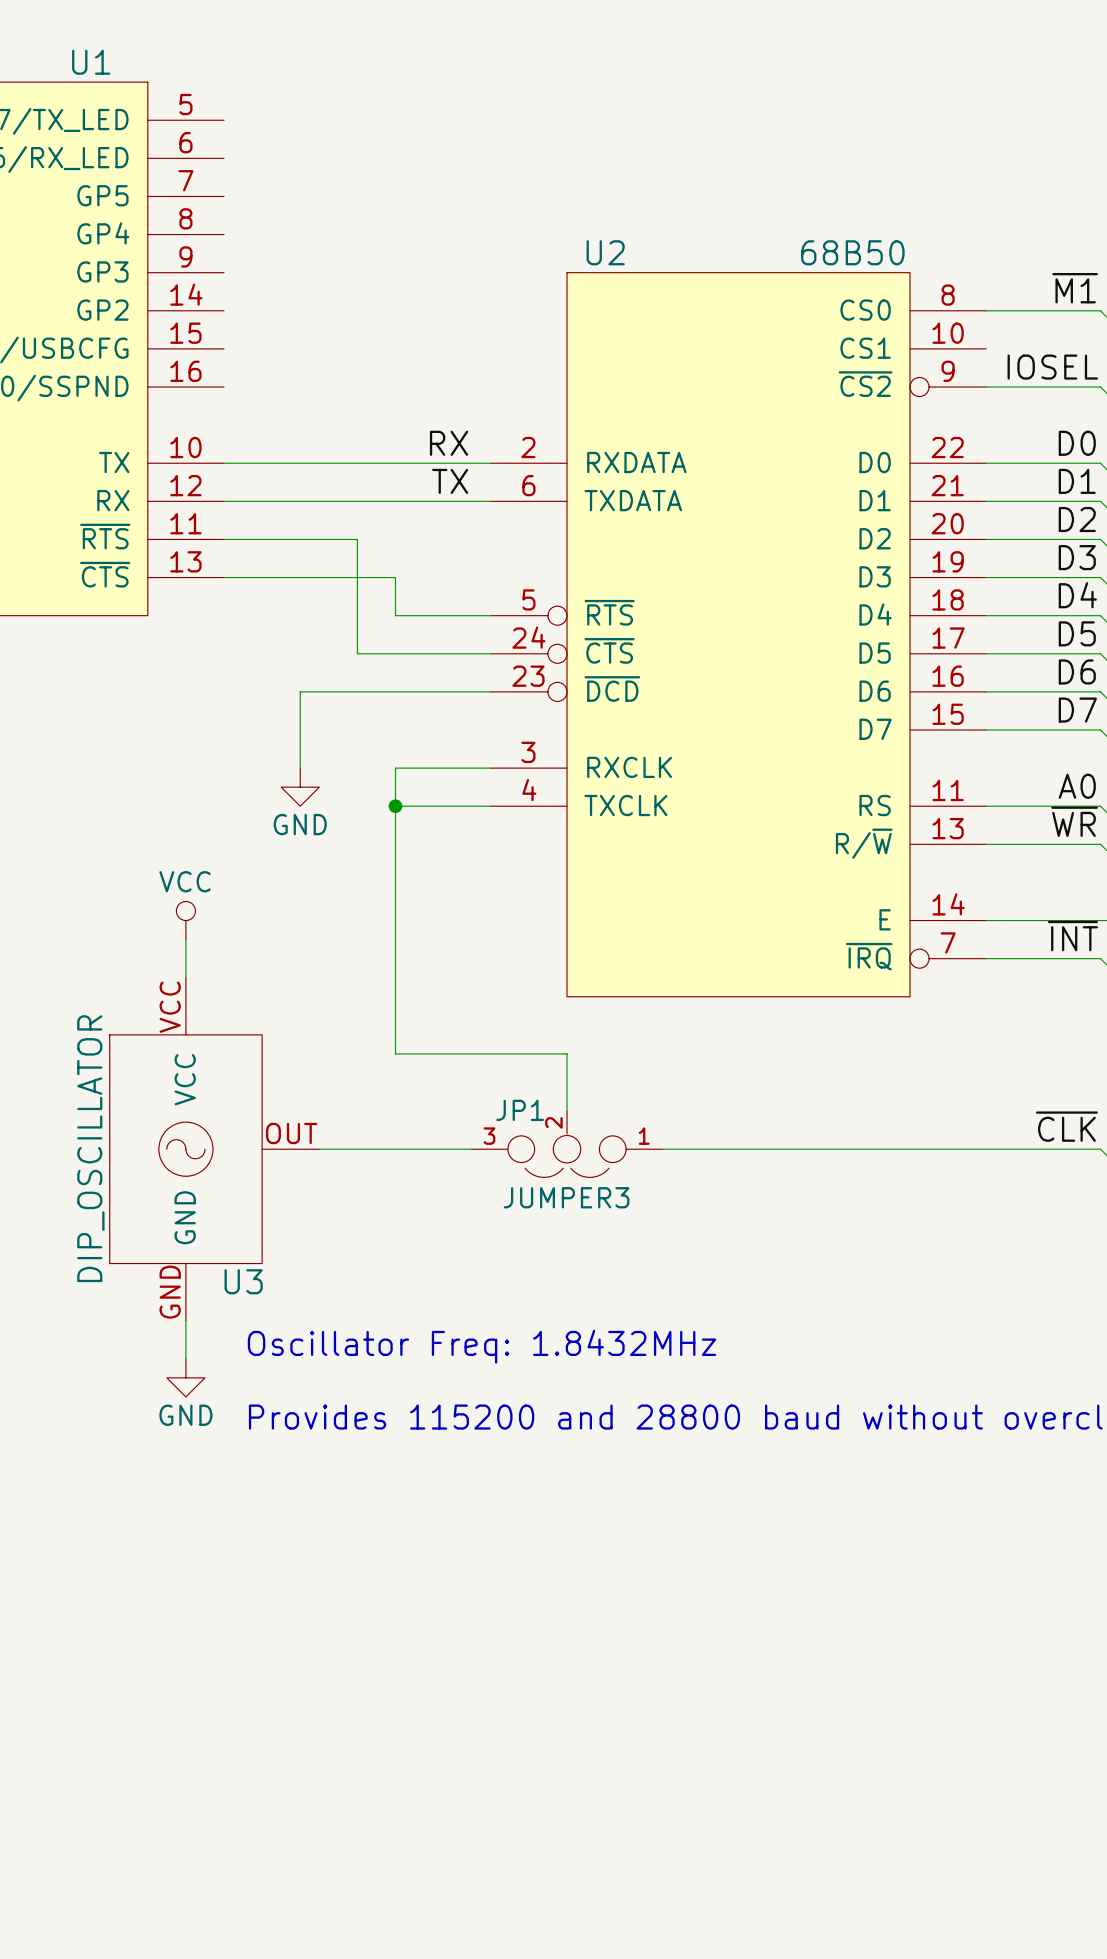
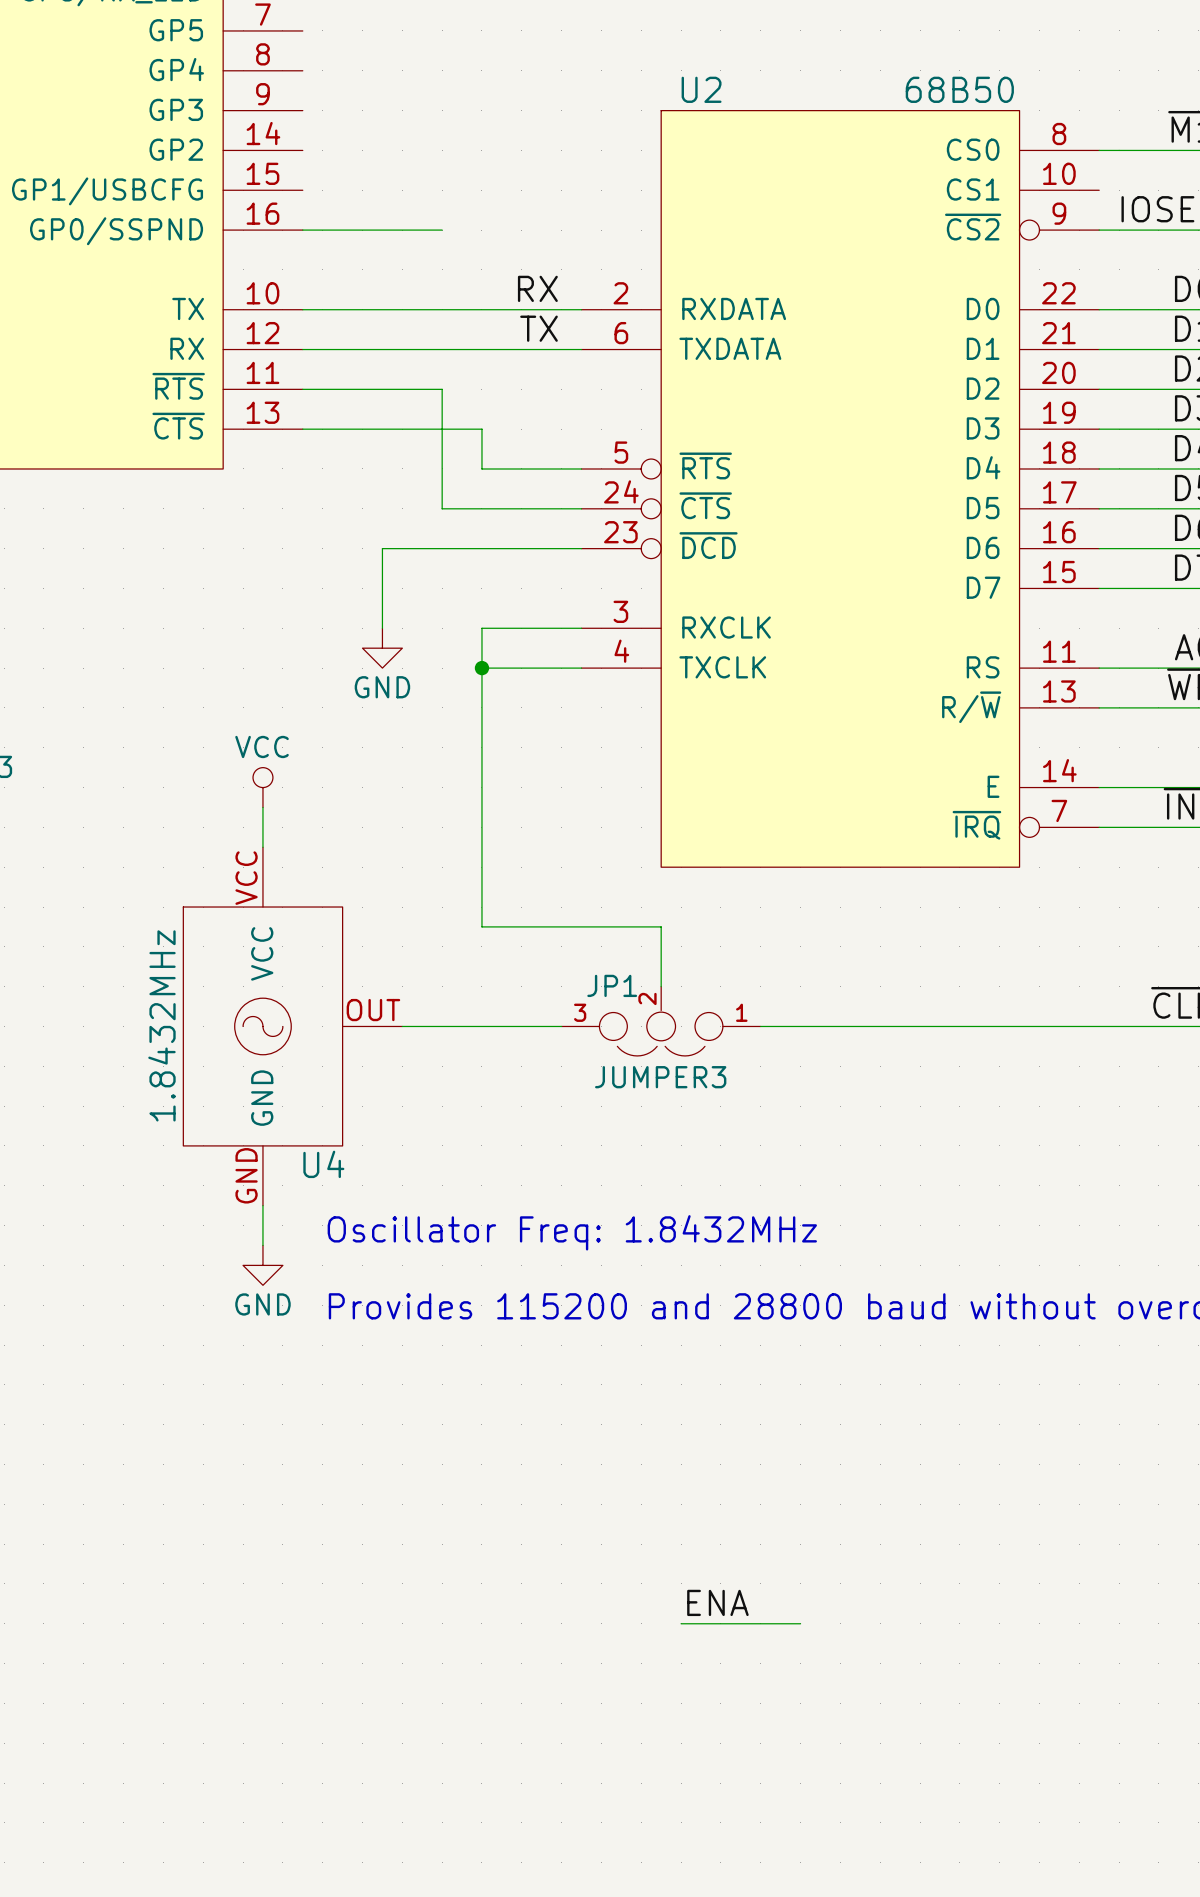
wire: none -> (302, 230) (442, 230)
U3 value: DIP_OSCILLATOR (90, 1148) -> 1.8432MHz (161, 1025)
U3 name: U3 (243, 1281) -> U4 (323, 1164)
label: none -> ENA (717, 1602)
wire: none -> (681, 1623) (800, 1623)

